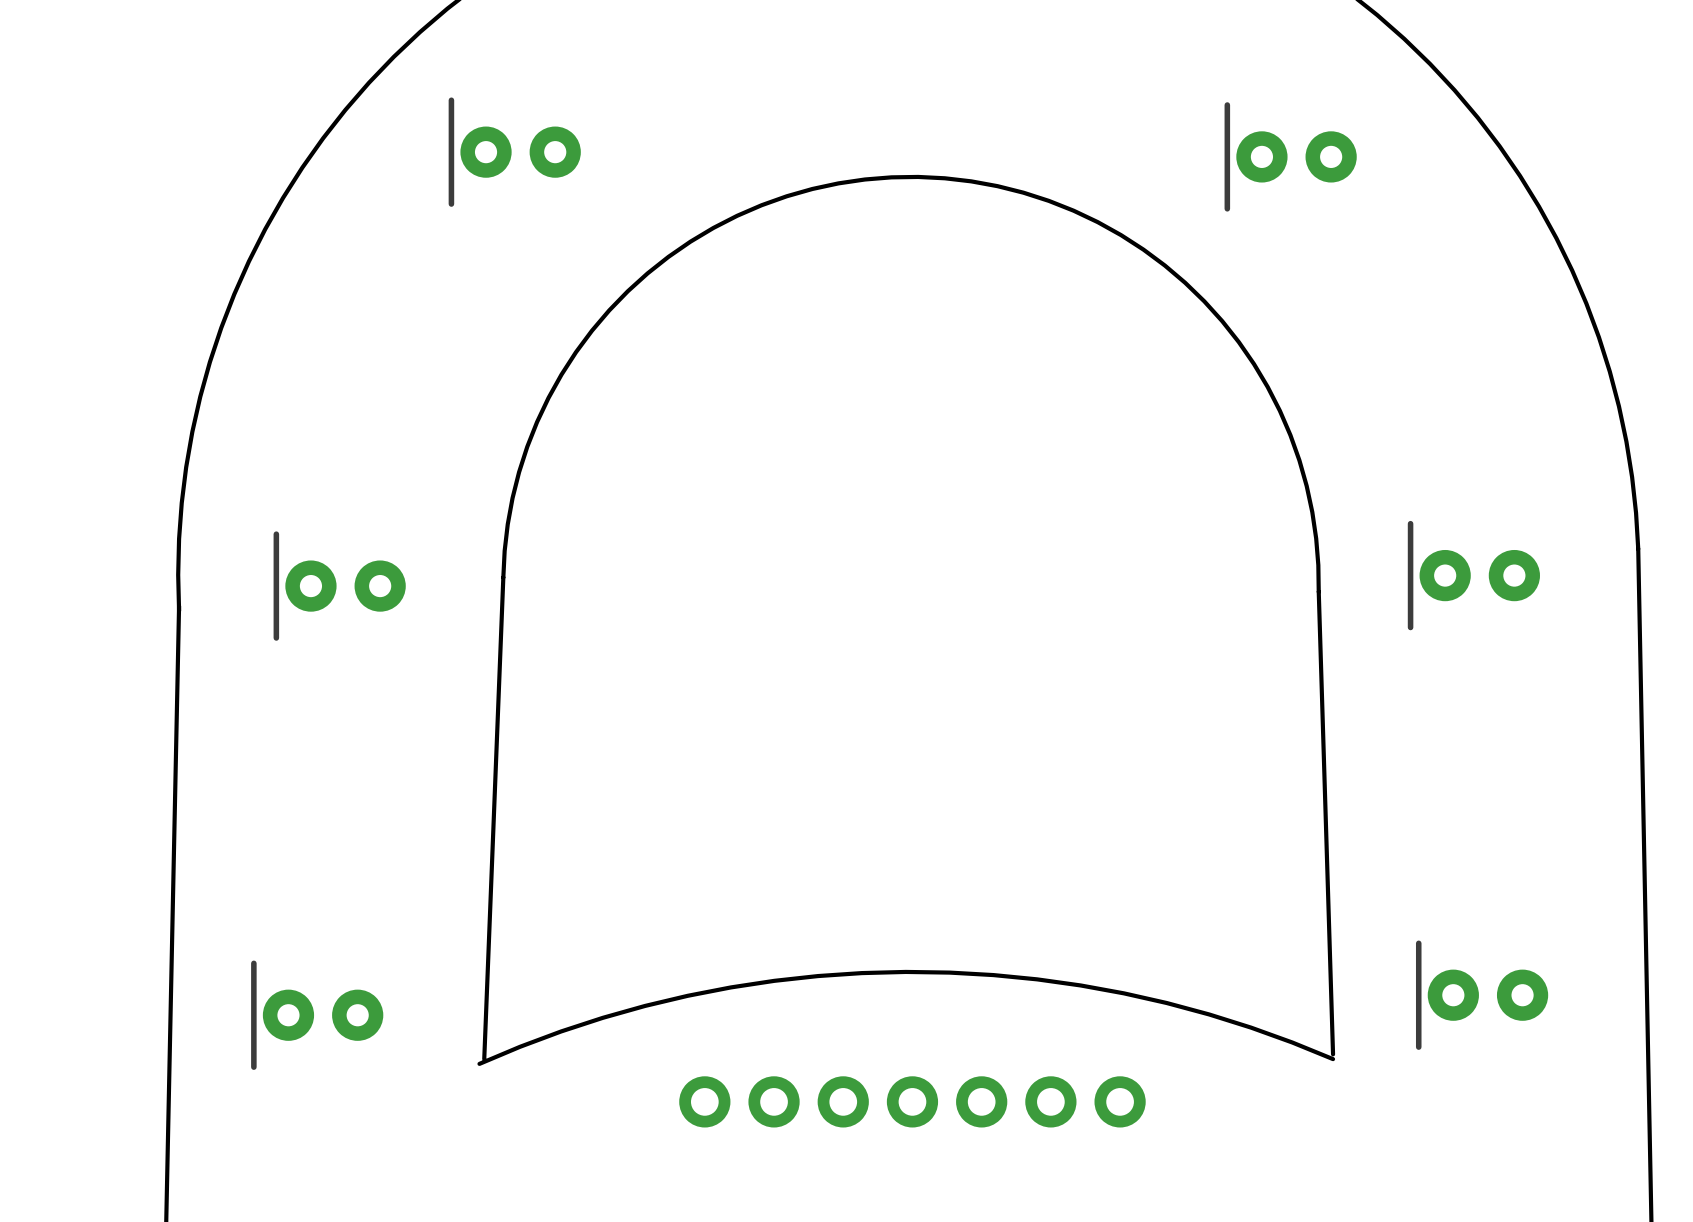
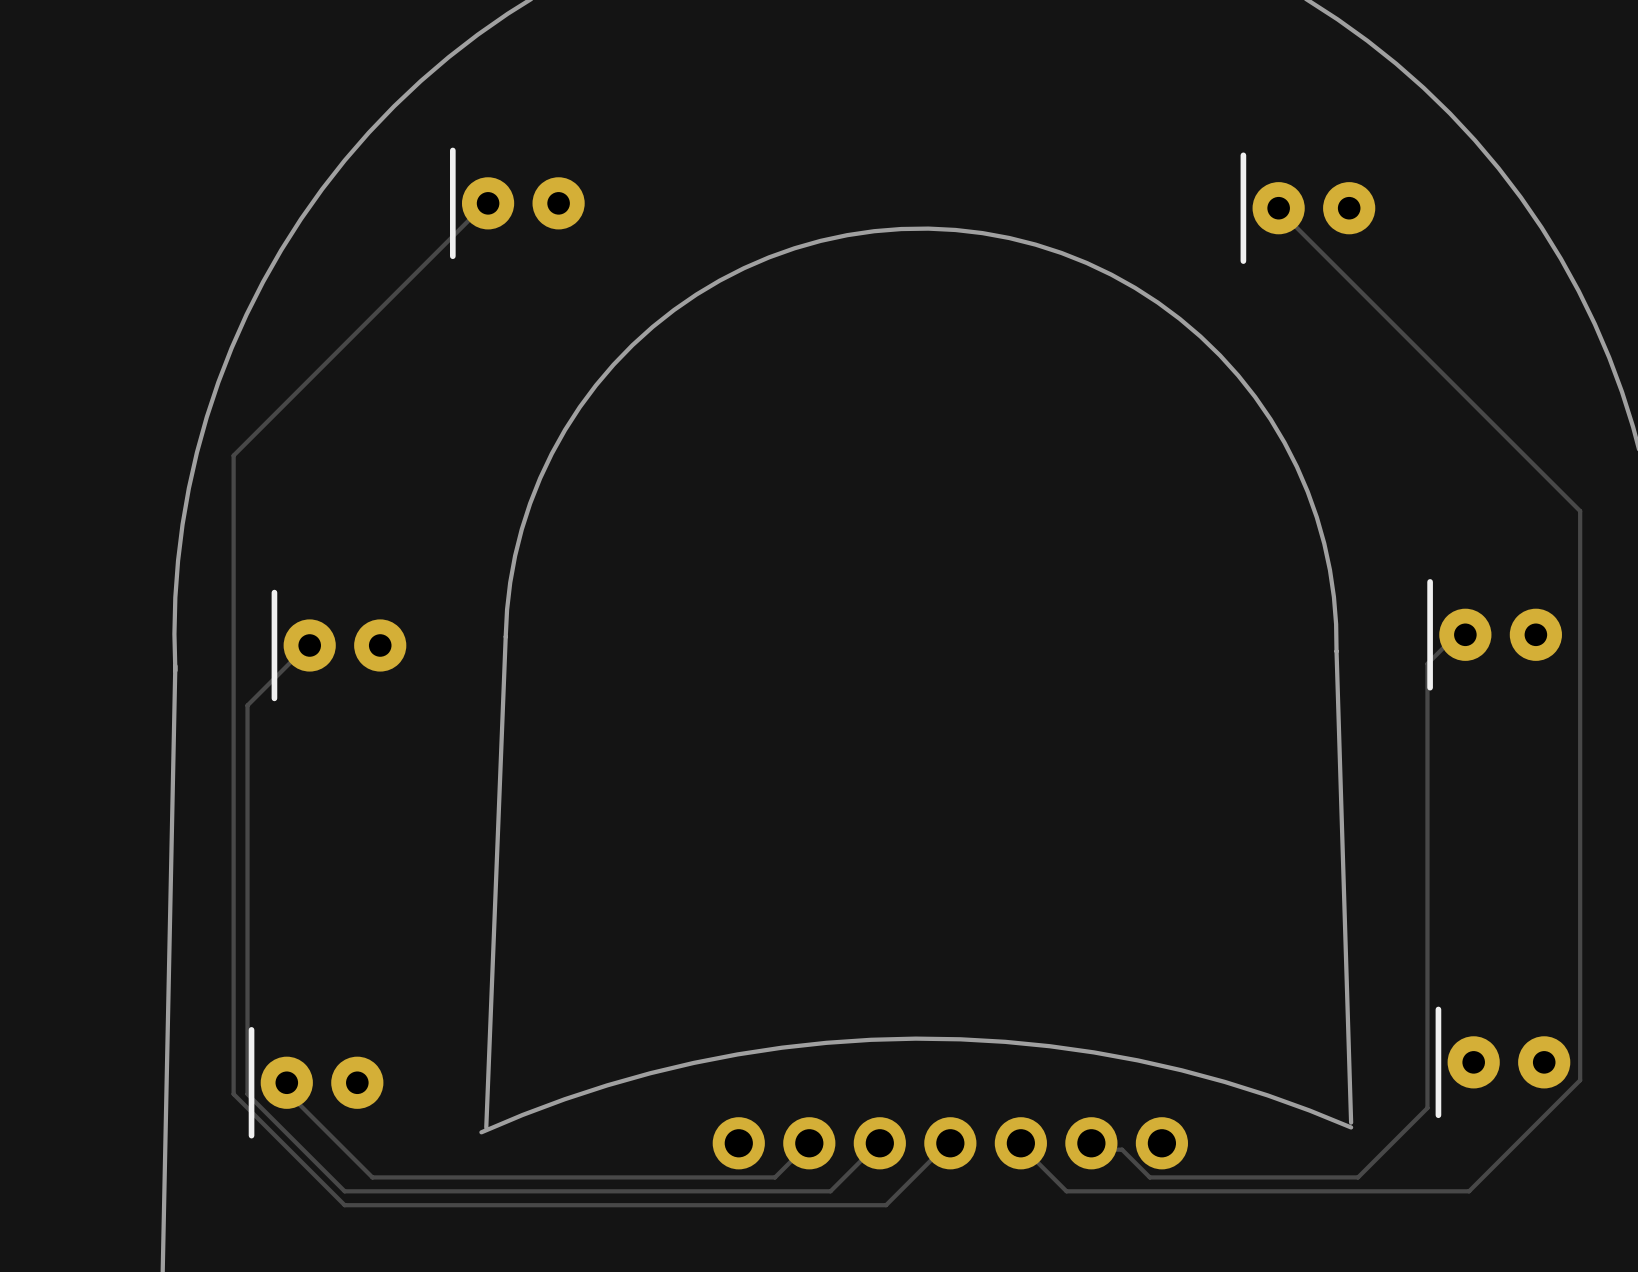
track: none -> (488, 203) (483, 205) (233, 455) (233, 1094) (344, 1205) (886, 1205) (950, 1143)
track: none -> (1278, 208) (1580, 511) (1580, 1080) (1469, 1191) (1066, 1191) (1020, 1143)
track: none -> (1465, 634) (1455, 636) (1427, 663) (1427, 1108) (1358, 1177) (1149, 1177) (1122, 1149) (1094, 1149) (1091, 1143)
track: none -> (309, 645) (247, 705) (247, 1094) (344, 1191) (830, 1191) (879, 1143)
track: none -> (286, 1082) (289, 1094) (372, 1177) (775, 1177) (809, 1143)
part position: (912, 1101) -> (950, 1143)

